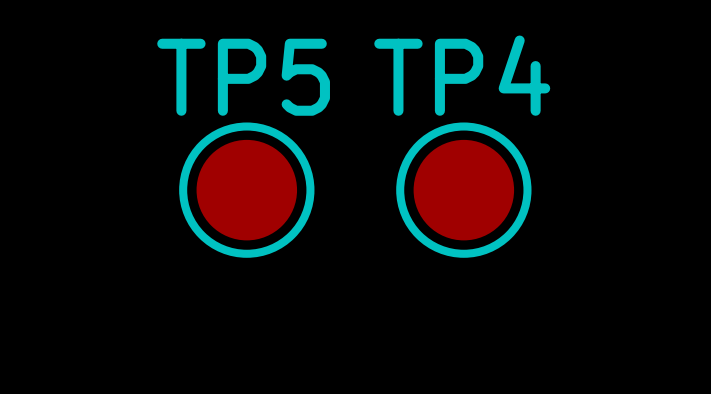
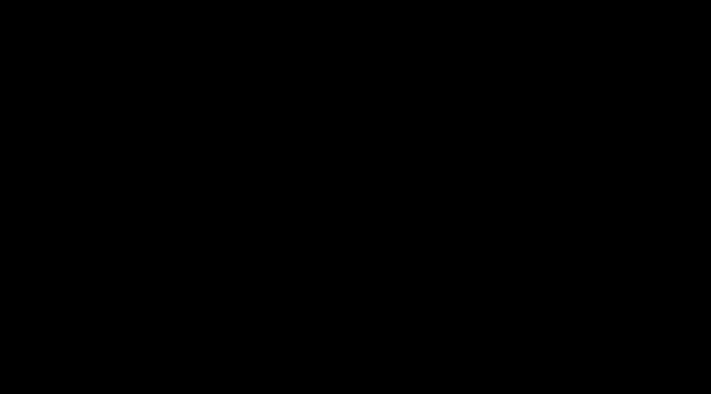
TP5: (246, 190) -> none
TP4: (463, 190) -> none

